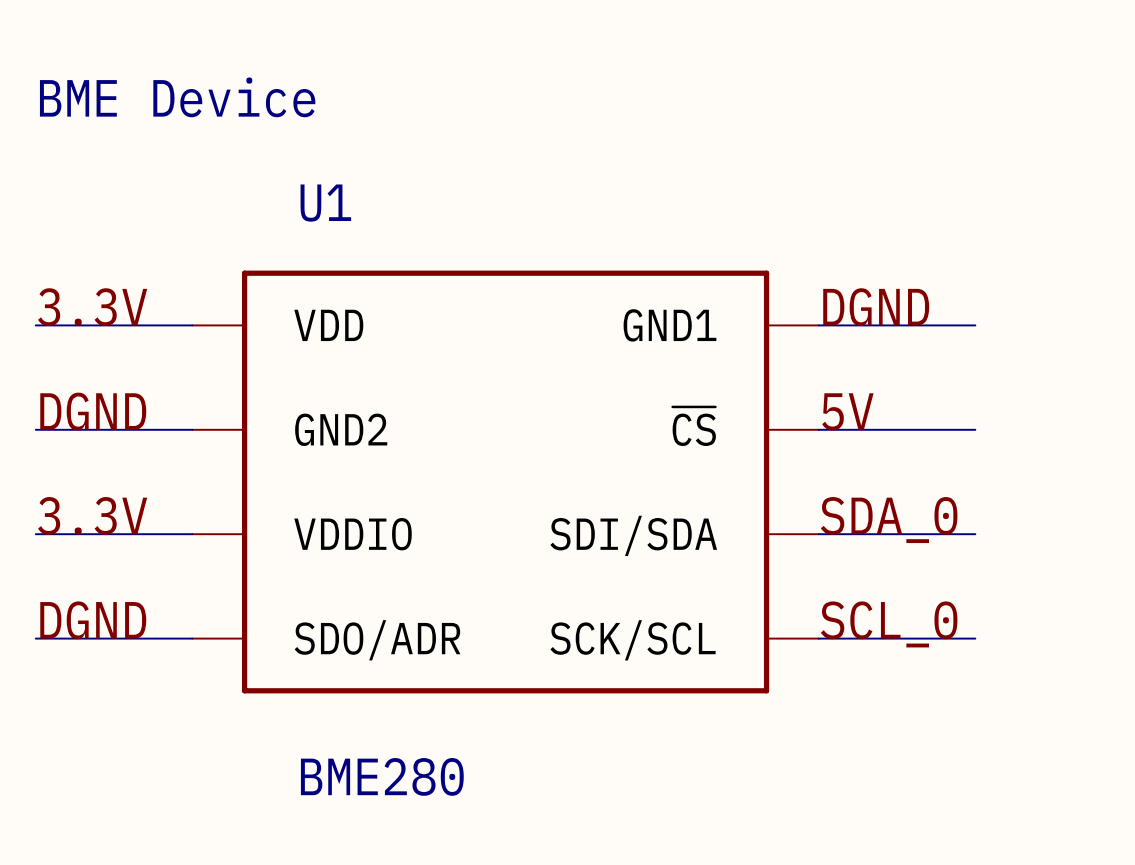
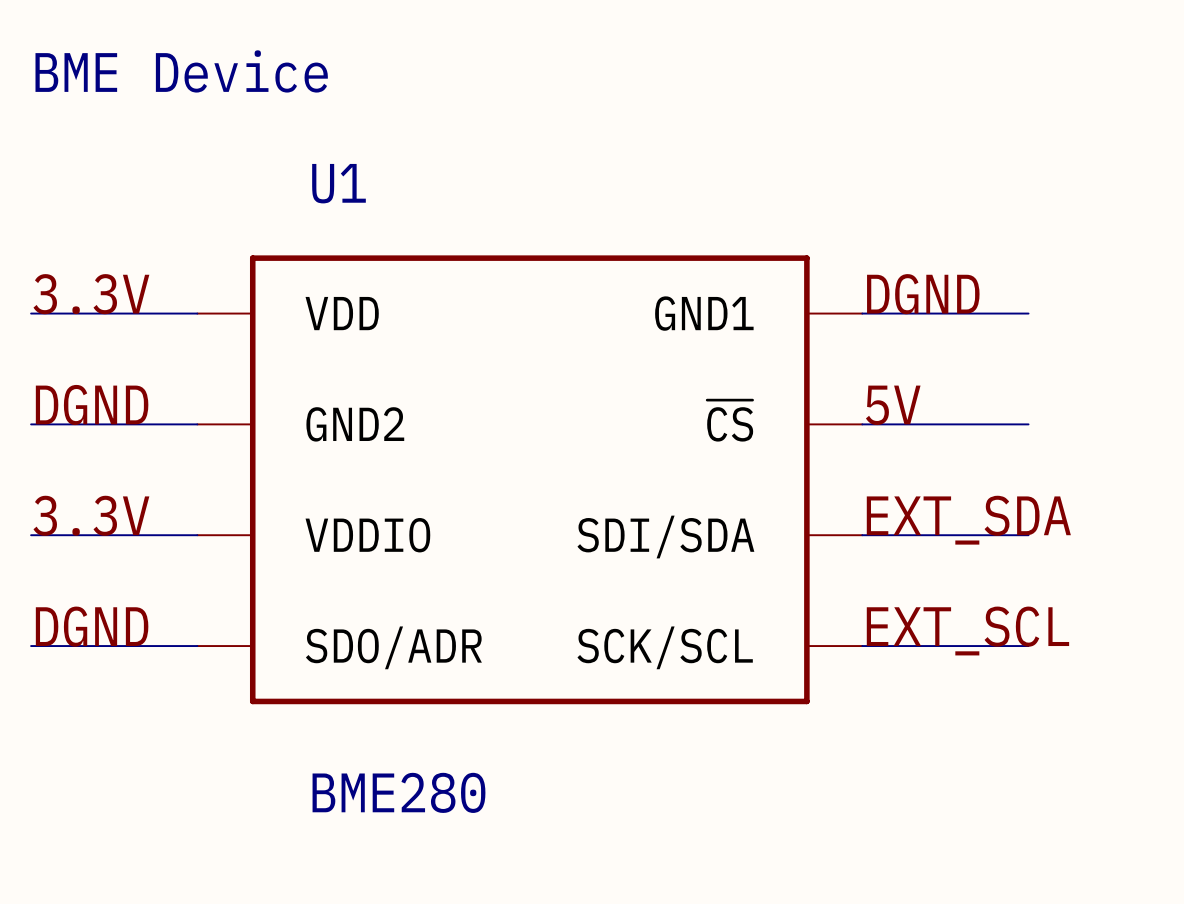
label: SDA_0 (889, 520) -> EXT_SDA (968, 520)
label: SCL_0 (889, 624) -> EXT_SCL (967, 631)

